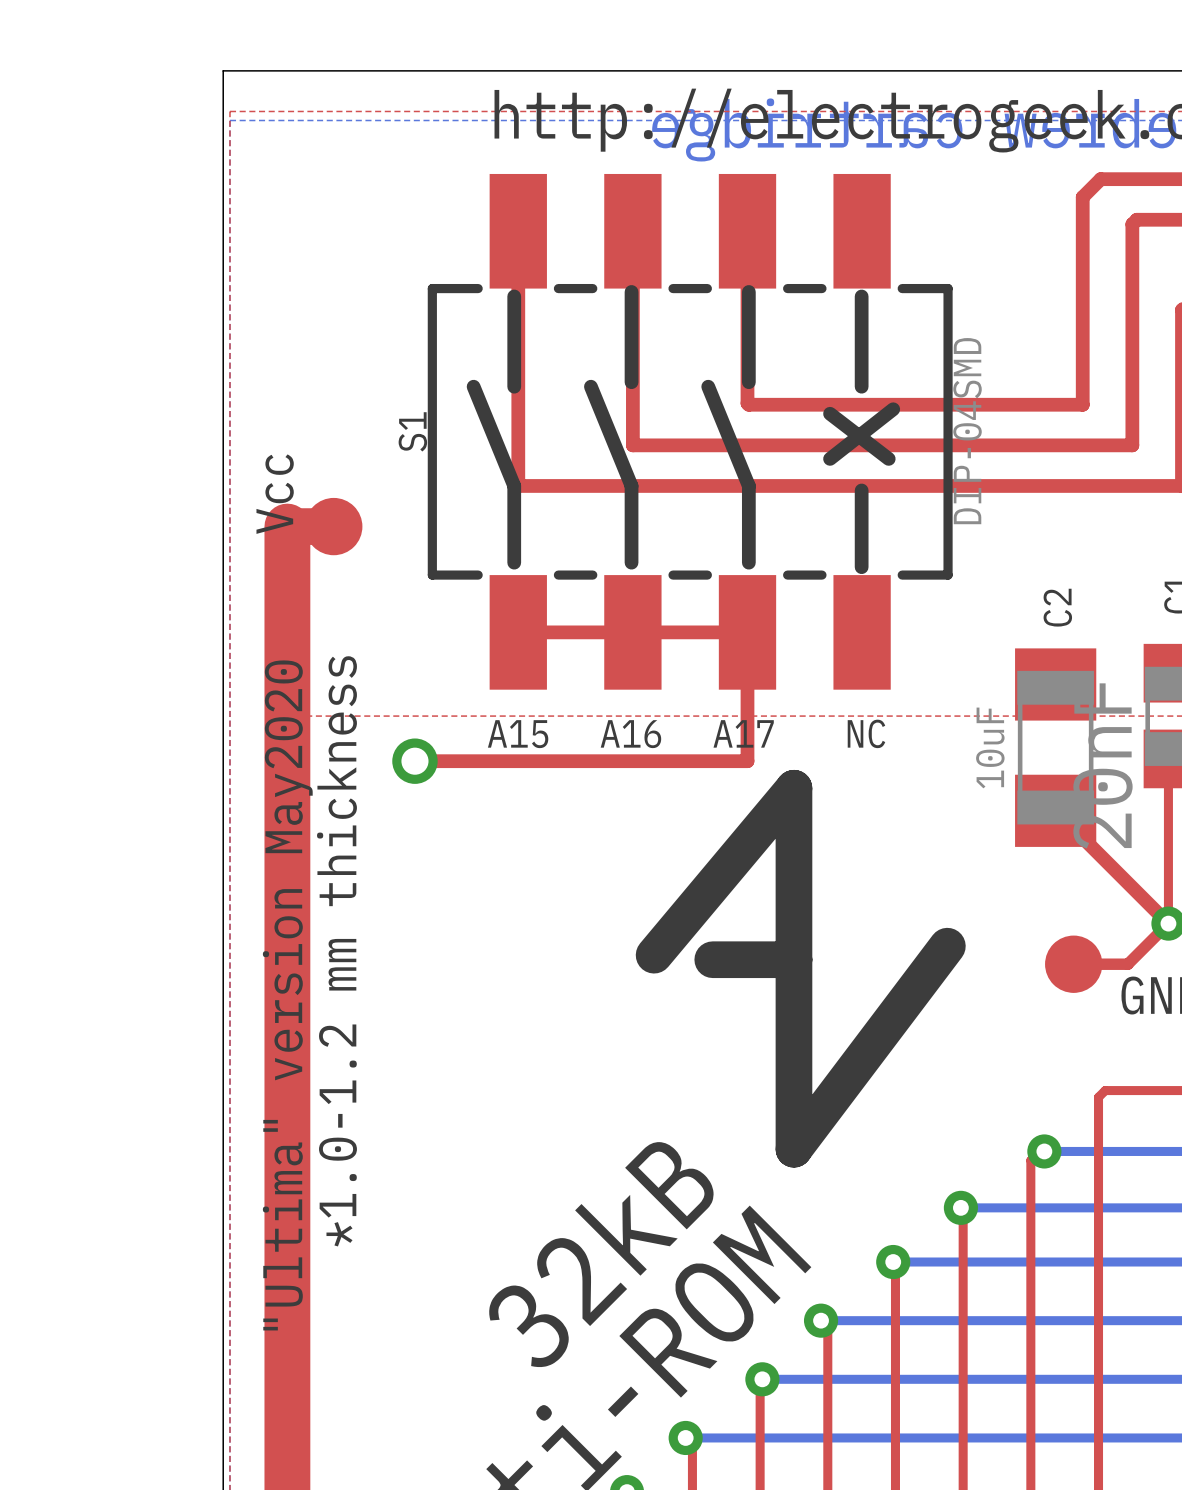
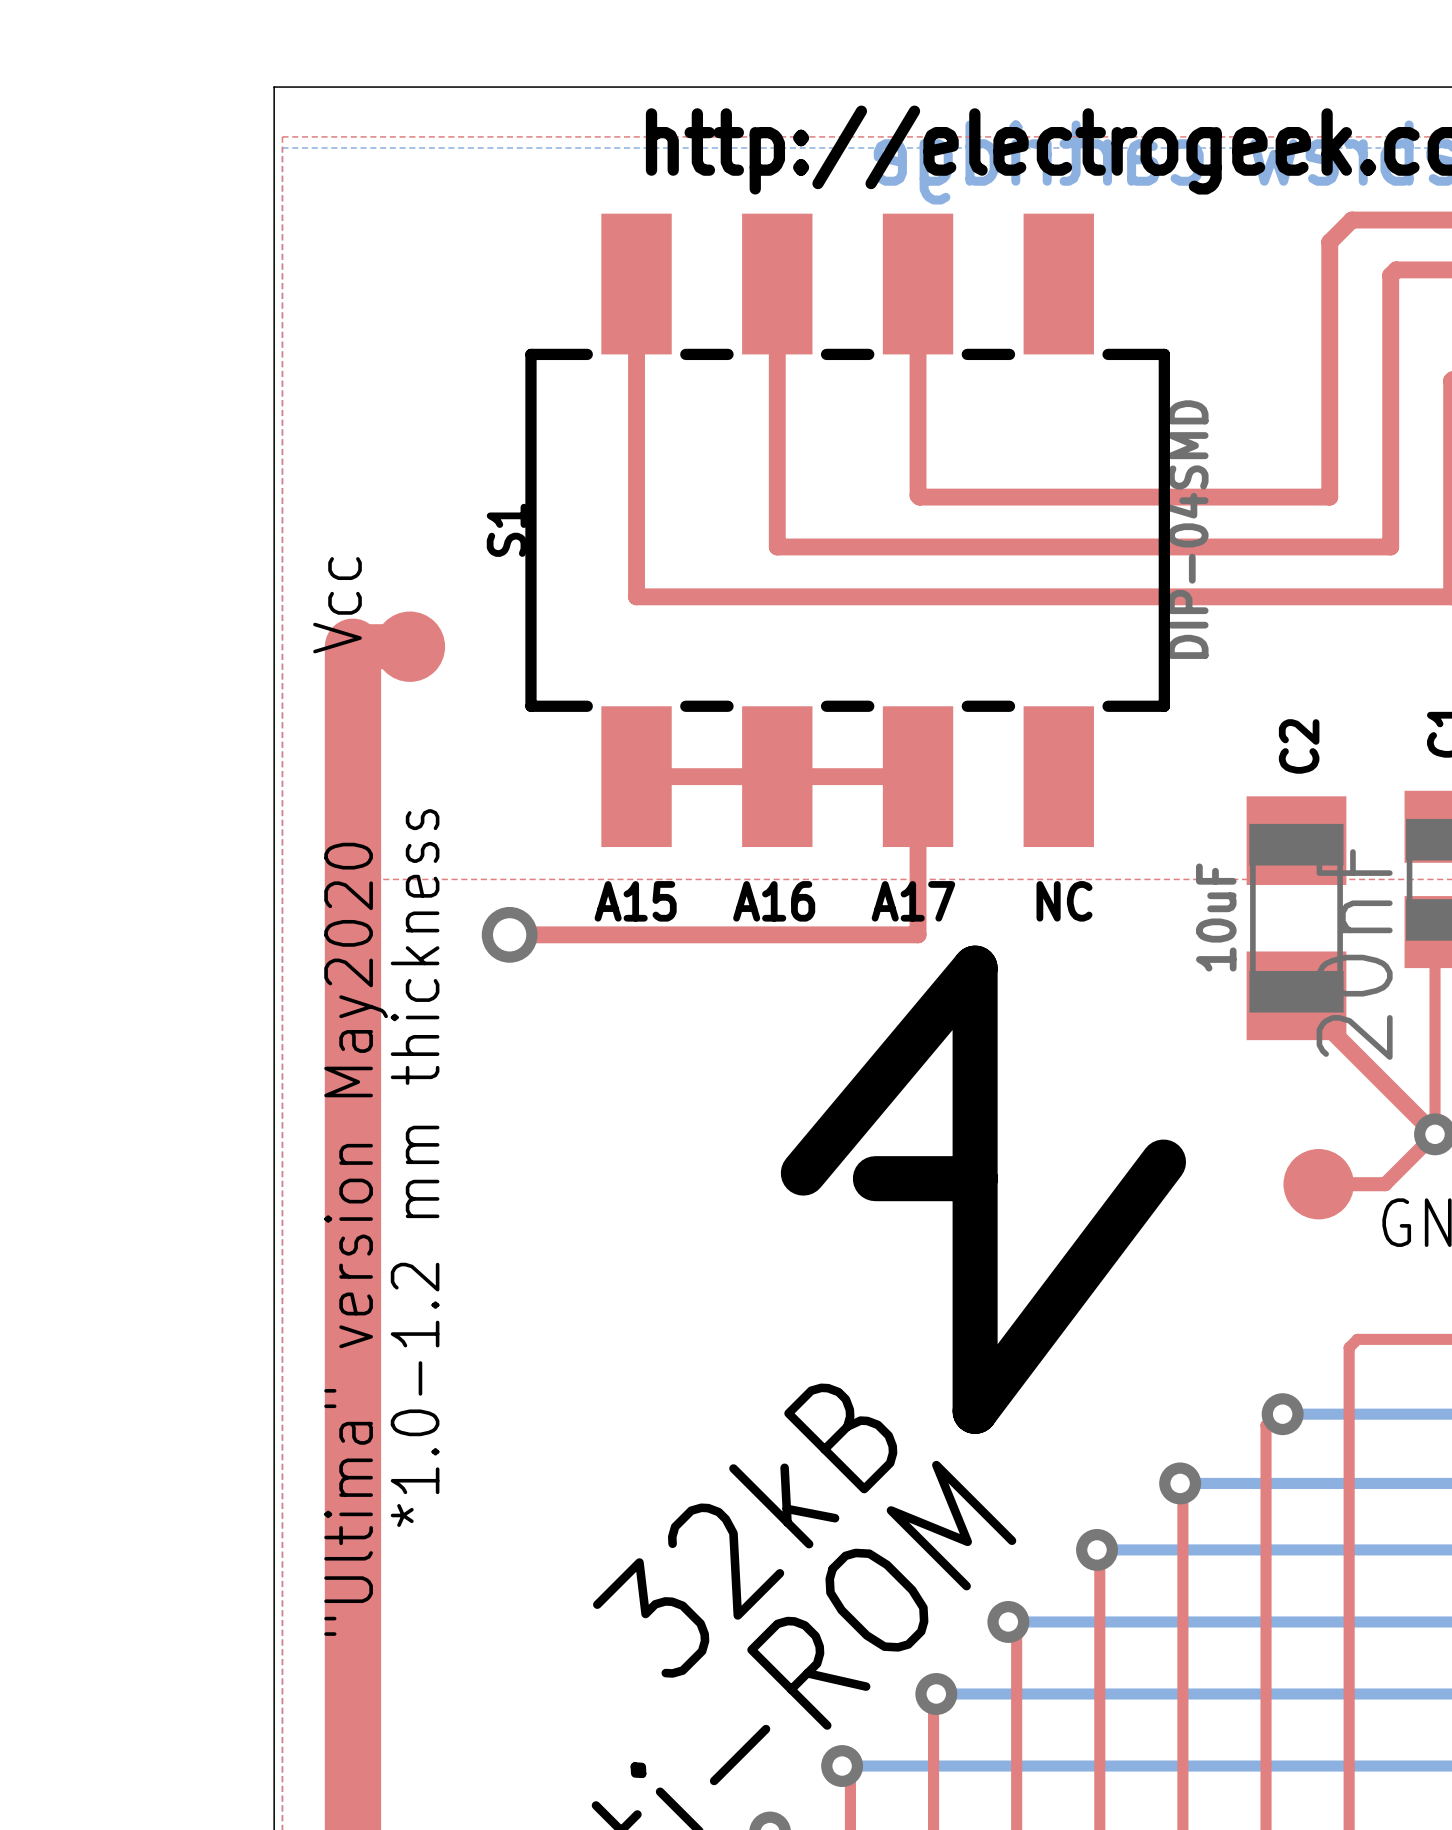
line: (631, 291) (631, 382) -> none
line: (748, 291) (748, 382) -> none
line: (514, 296) (514, 386) -> none
line: (861, 296) (861, 386) -> none
line: (473, 386) (514, 485) (514, 562) -> none
line: (590, 386) (631, 485) (631, 562) -> none
line: (708, 386) (748, 485) (748, 562) -> none
line: (893, 409) (830, 458) -> none
line: (830, 413) (888, 458) -> none
line: (861, 490) (861, 567) -> none

